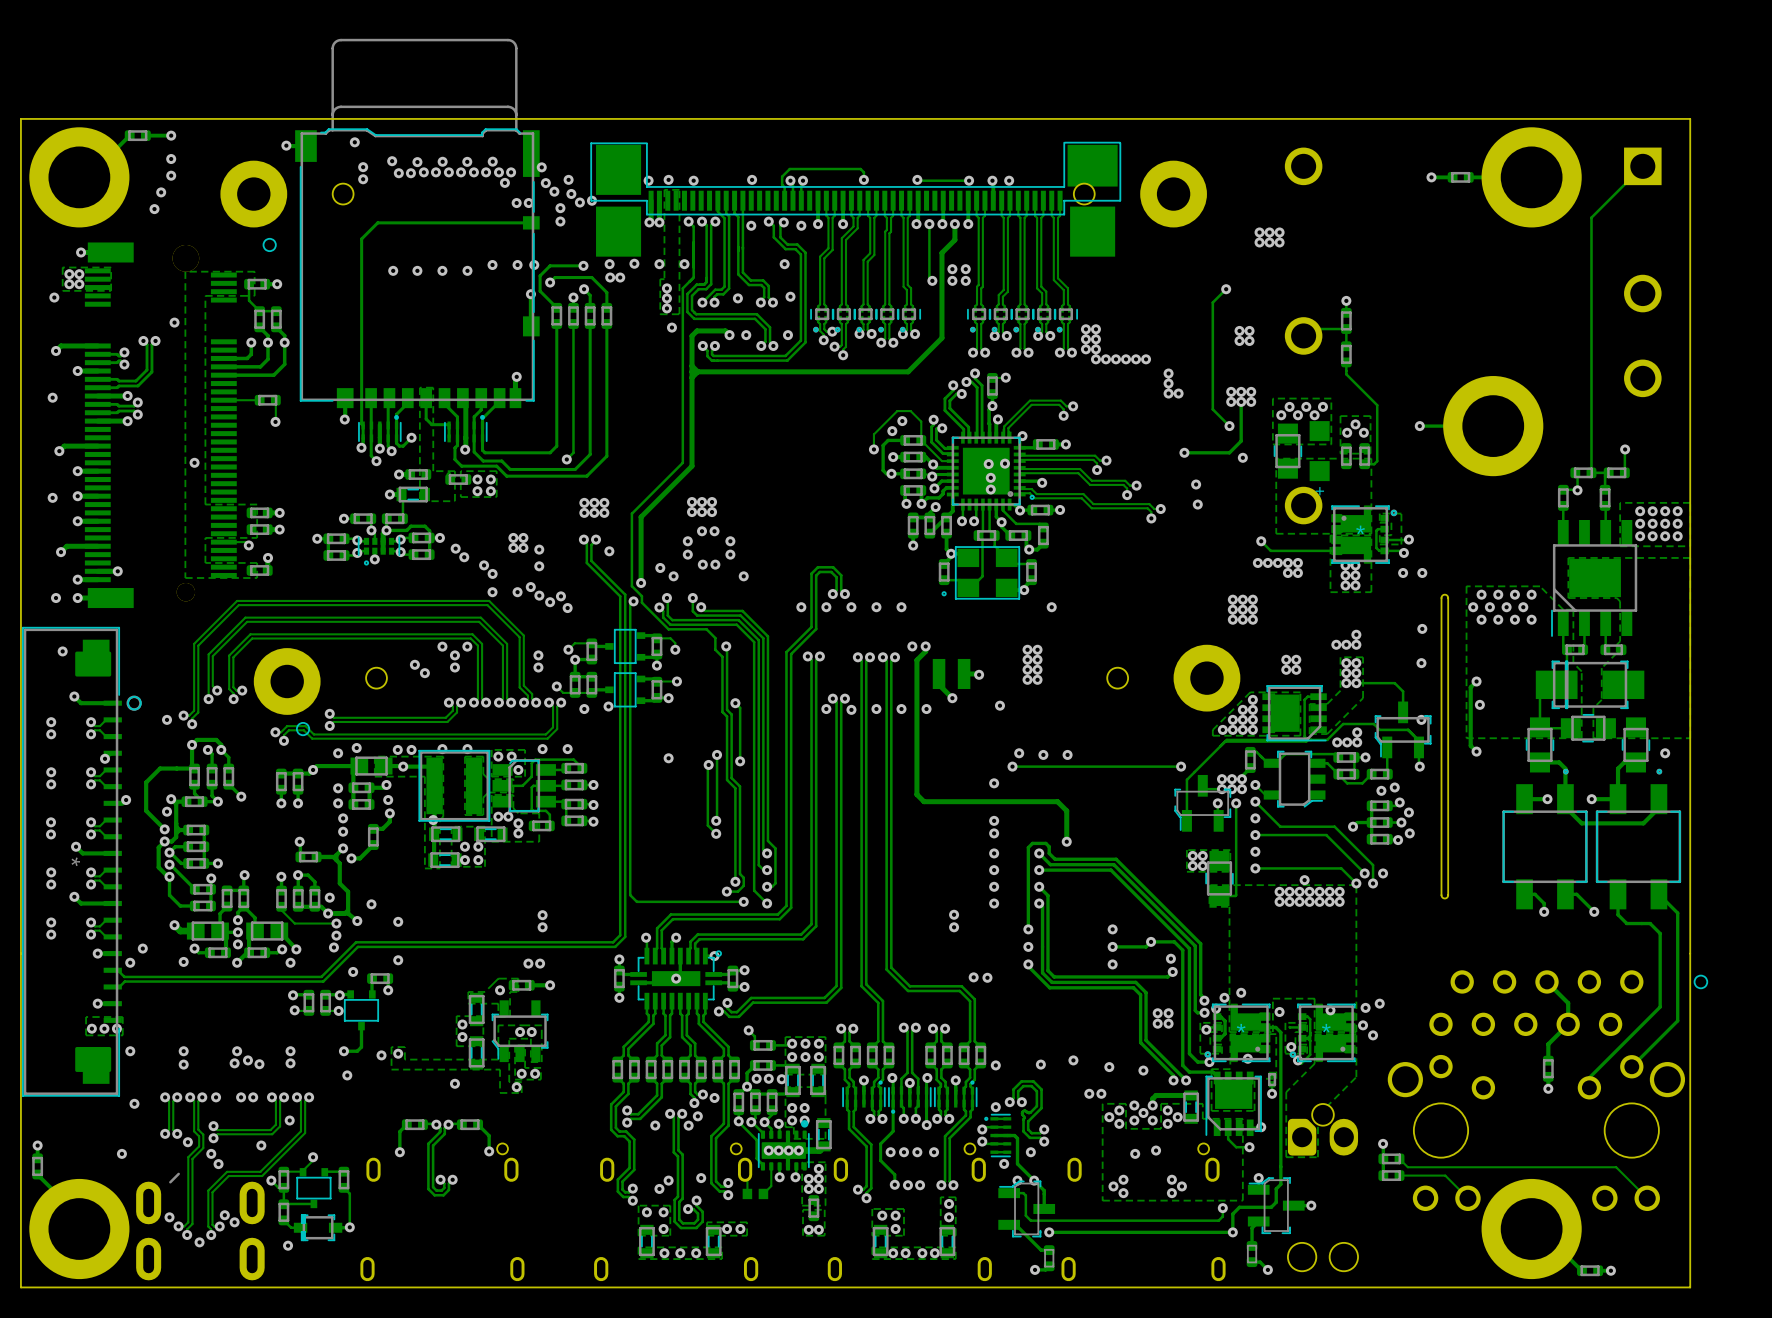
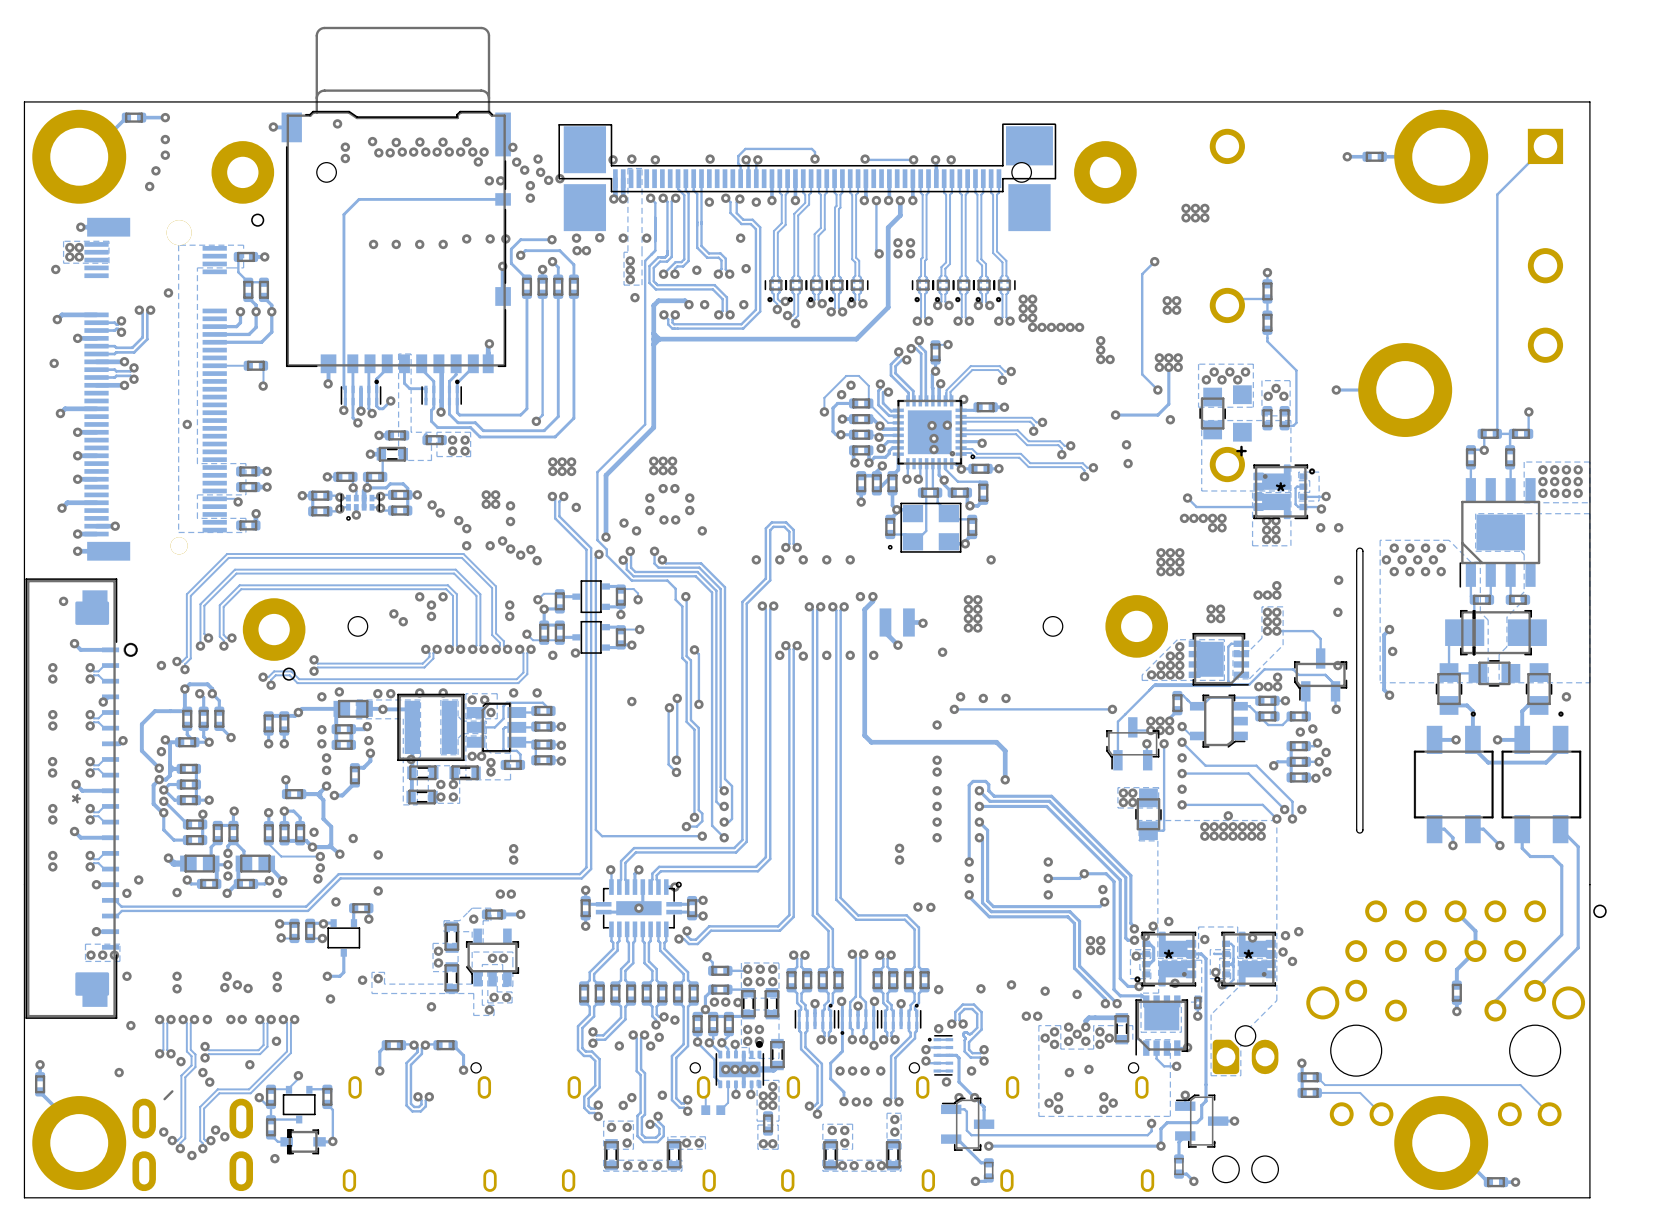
via: (52, 497) -> none
via: (56, 598) -> none

